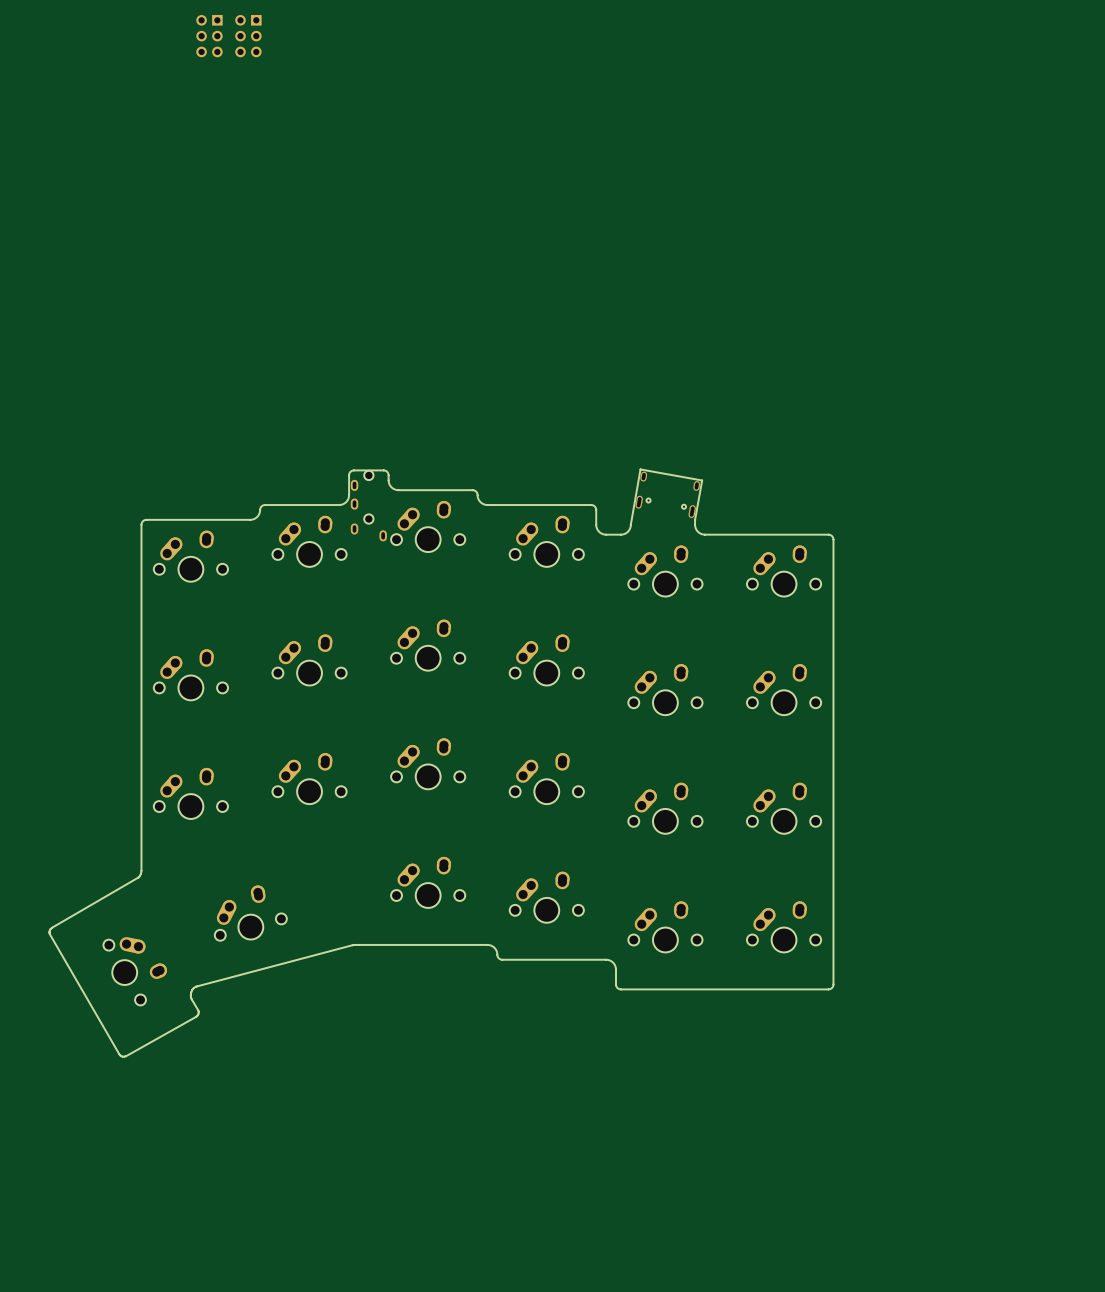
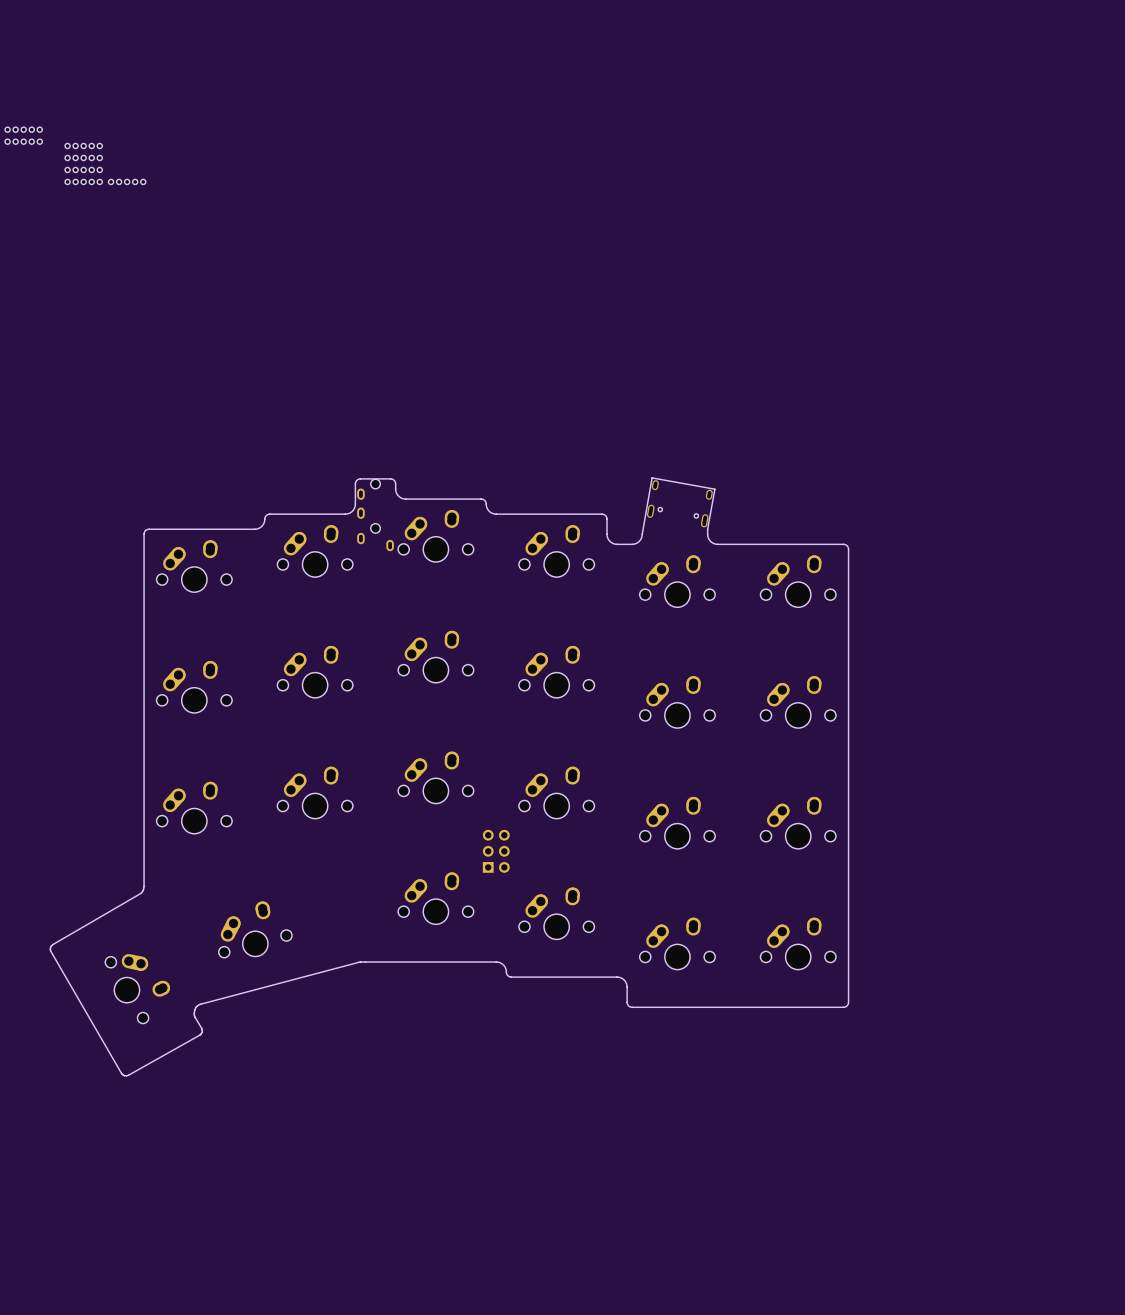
part: (209, 36) -> none
part: (248, 36) -> none
part: none -> (23, 129)
part: none -> (23, 141)
part: none -> (83, 146)
part: none -> (83, 157)
part: none -> (83, 169)
part: none -> (83, 181)
part: none -> (127, 181)
part: none -> (496, 851)

